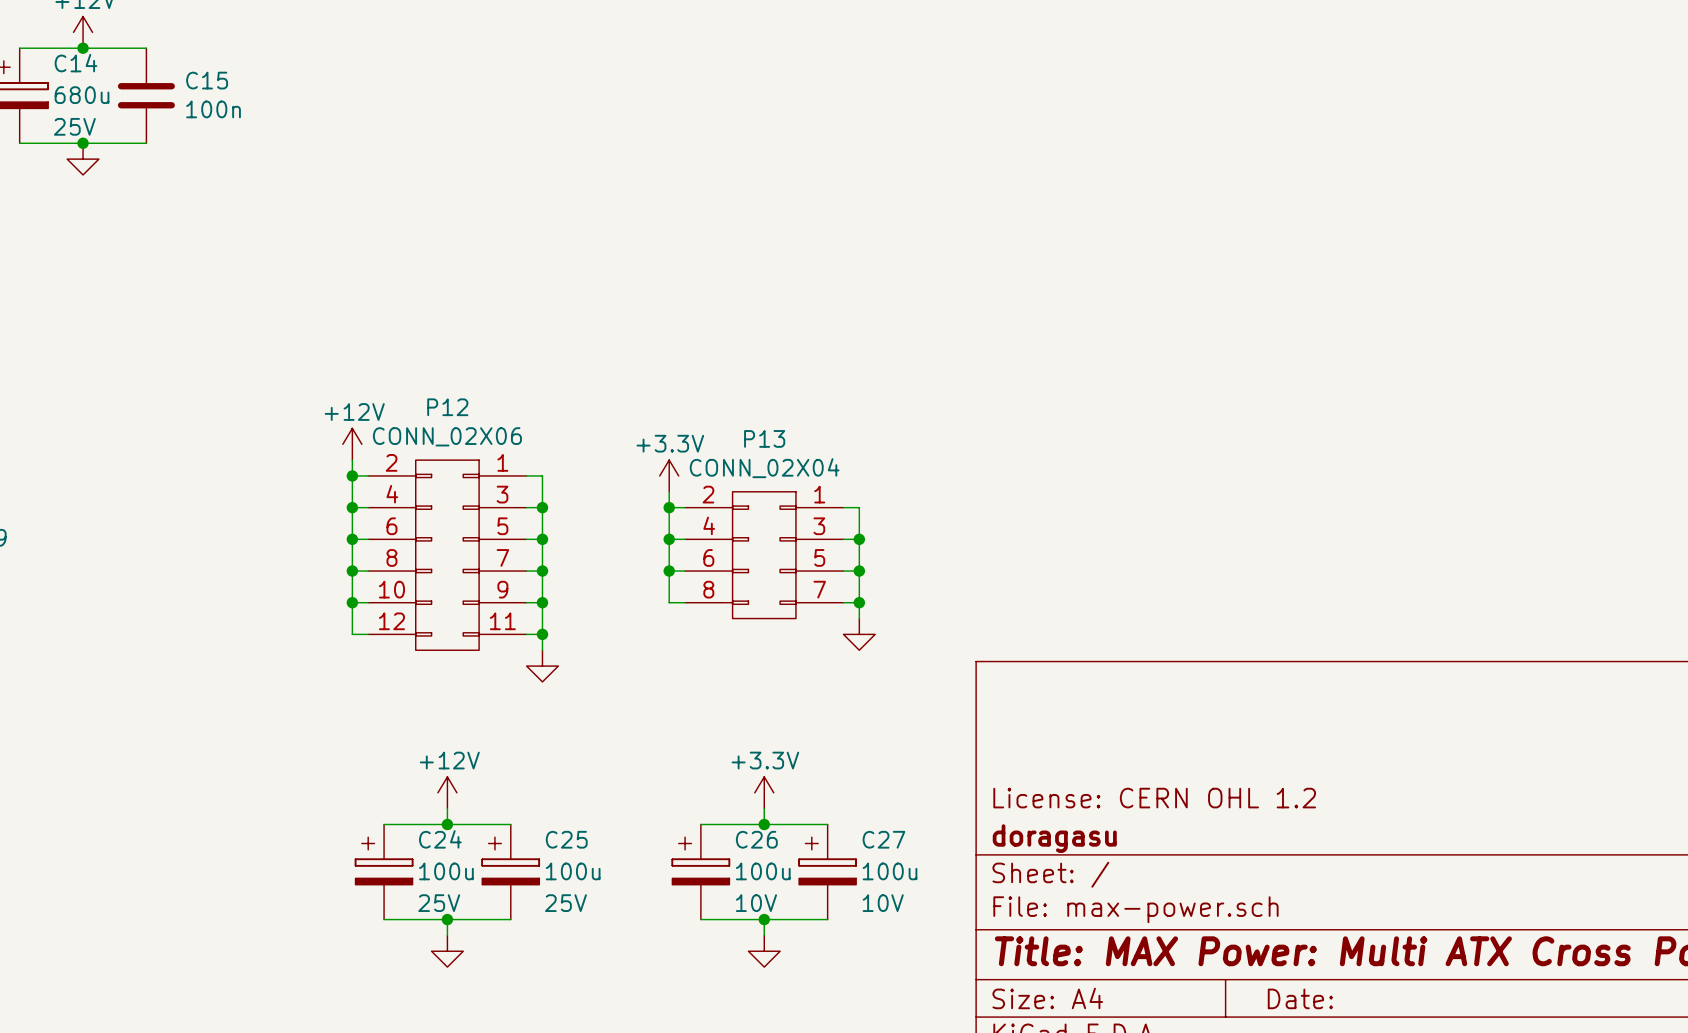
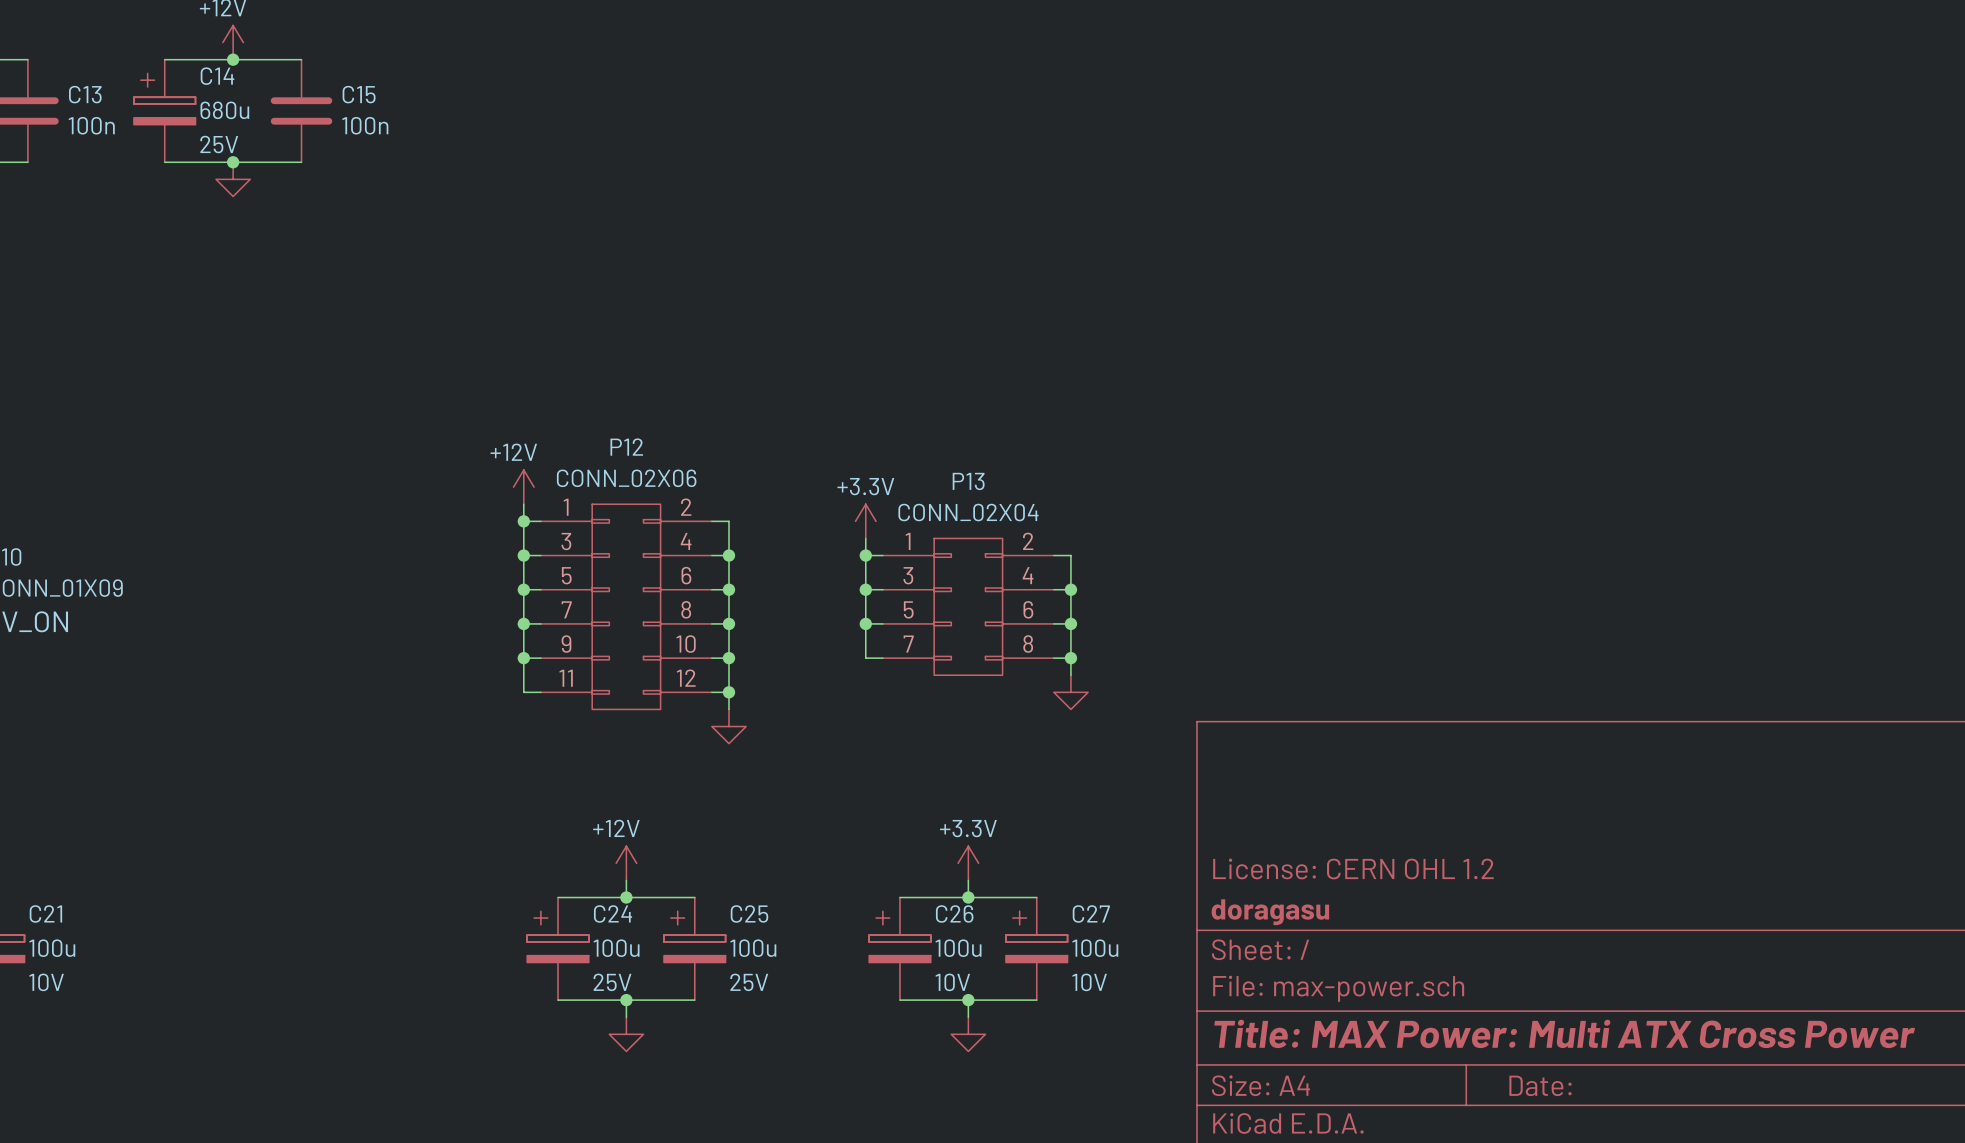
P12 flip: as is (447, 555) -> left-right (626, 606)
P13 flip: as is (764, 555) -> left-right (968, 606)

